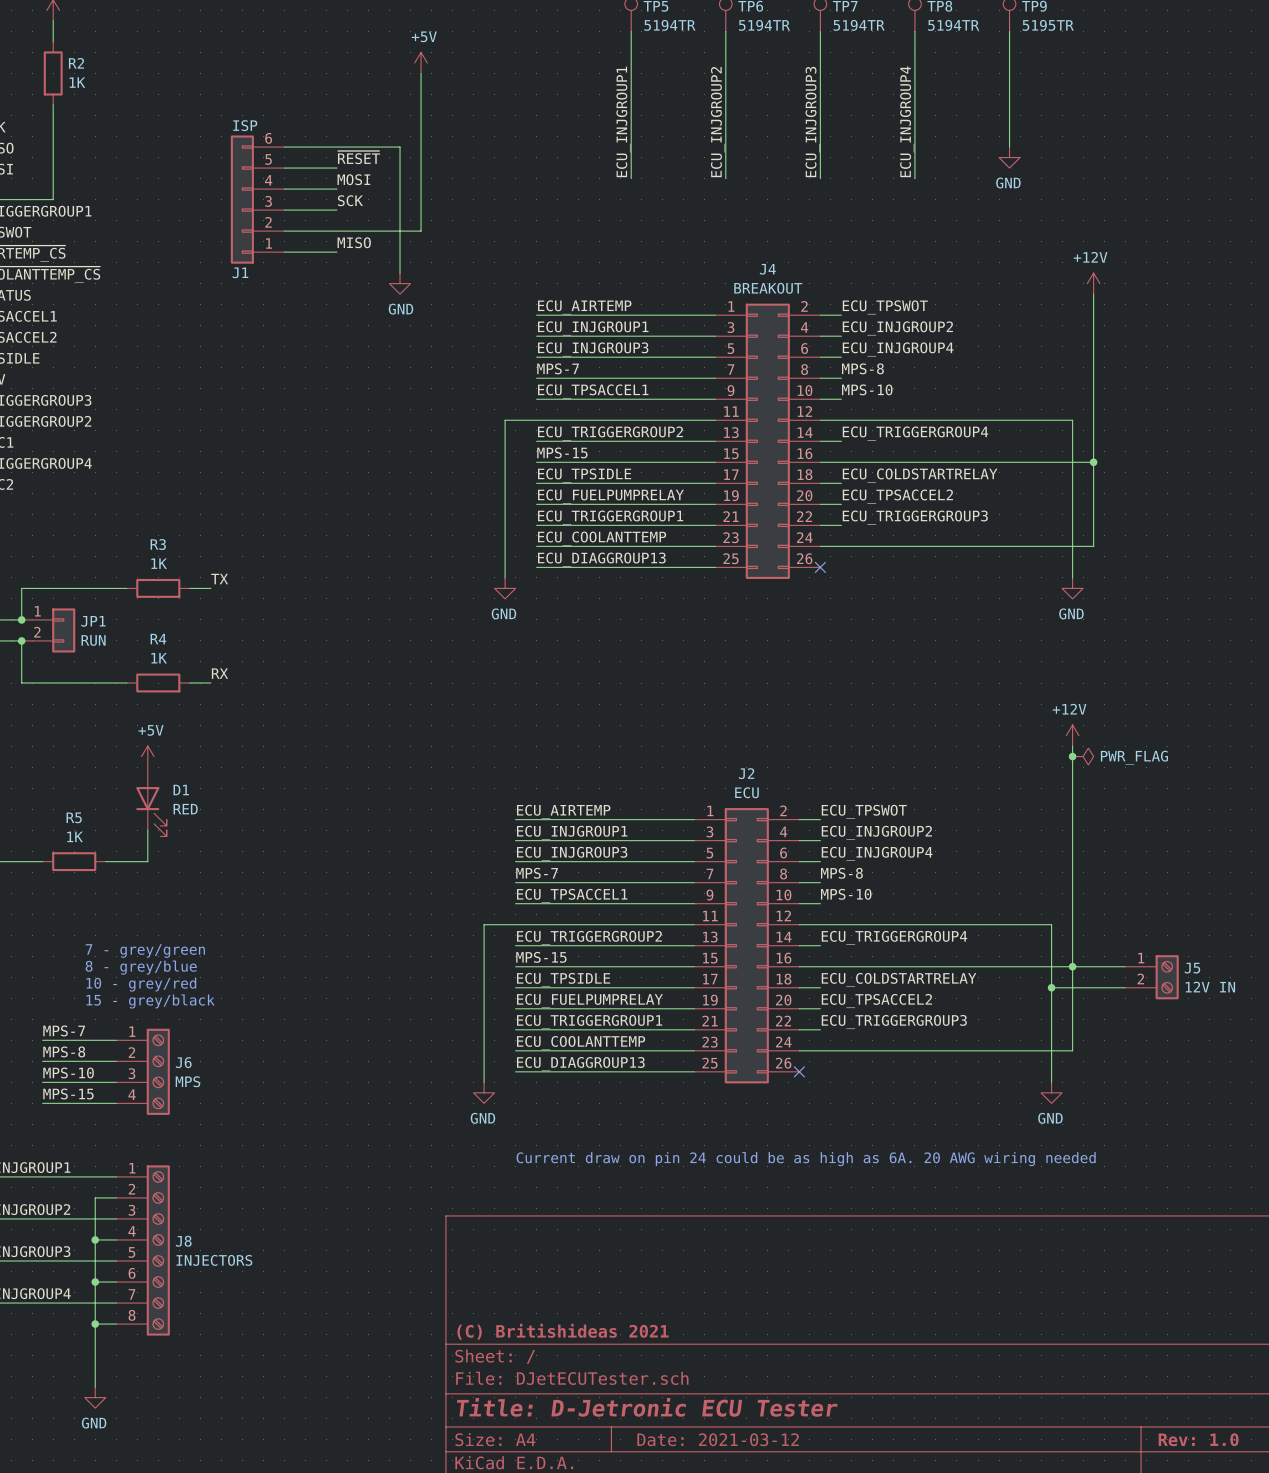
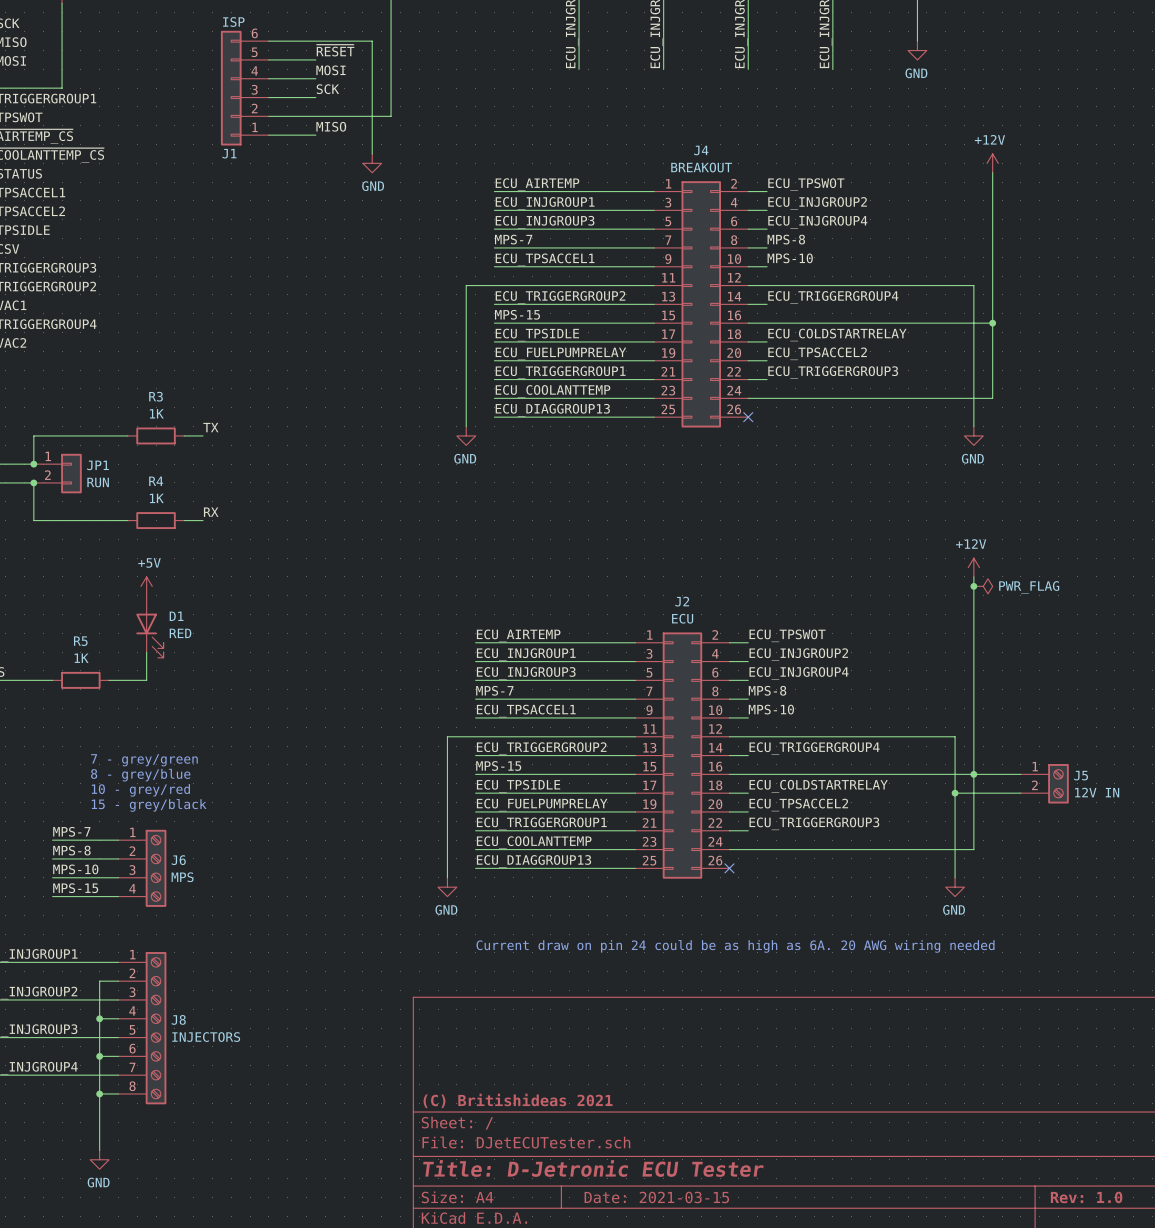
title block: Date: 2021-03-12 (718, 1439) -> Date: 2021-03-15 (656, 1197)

